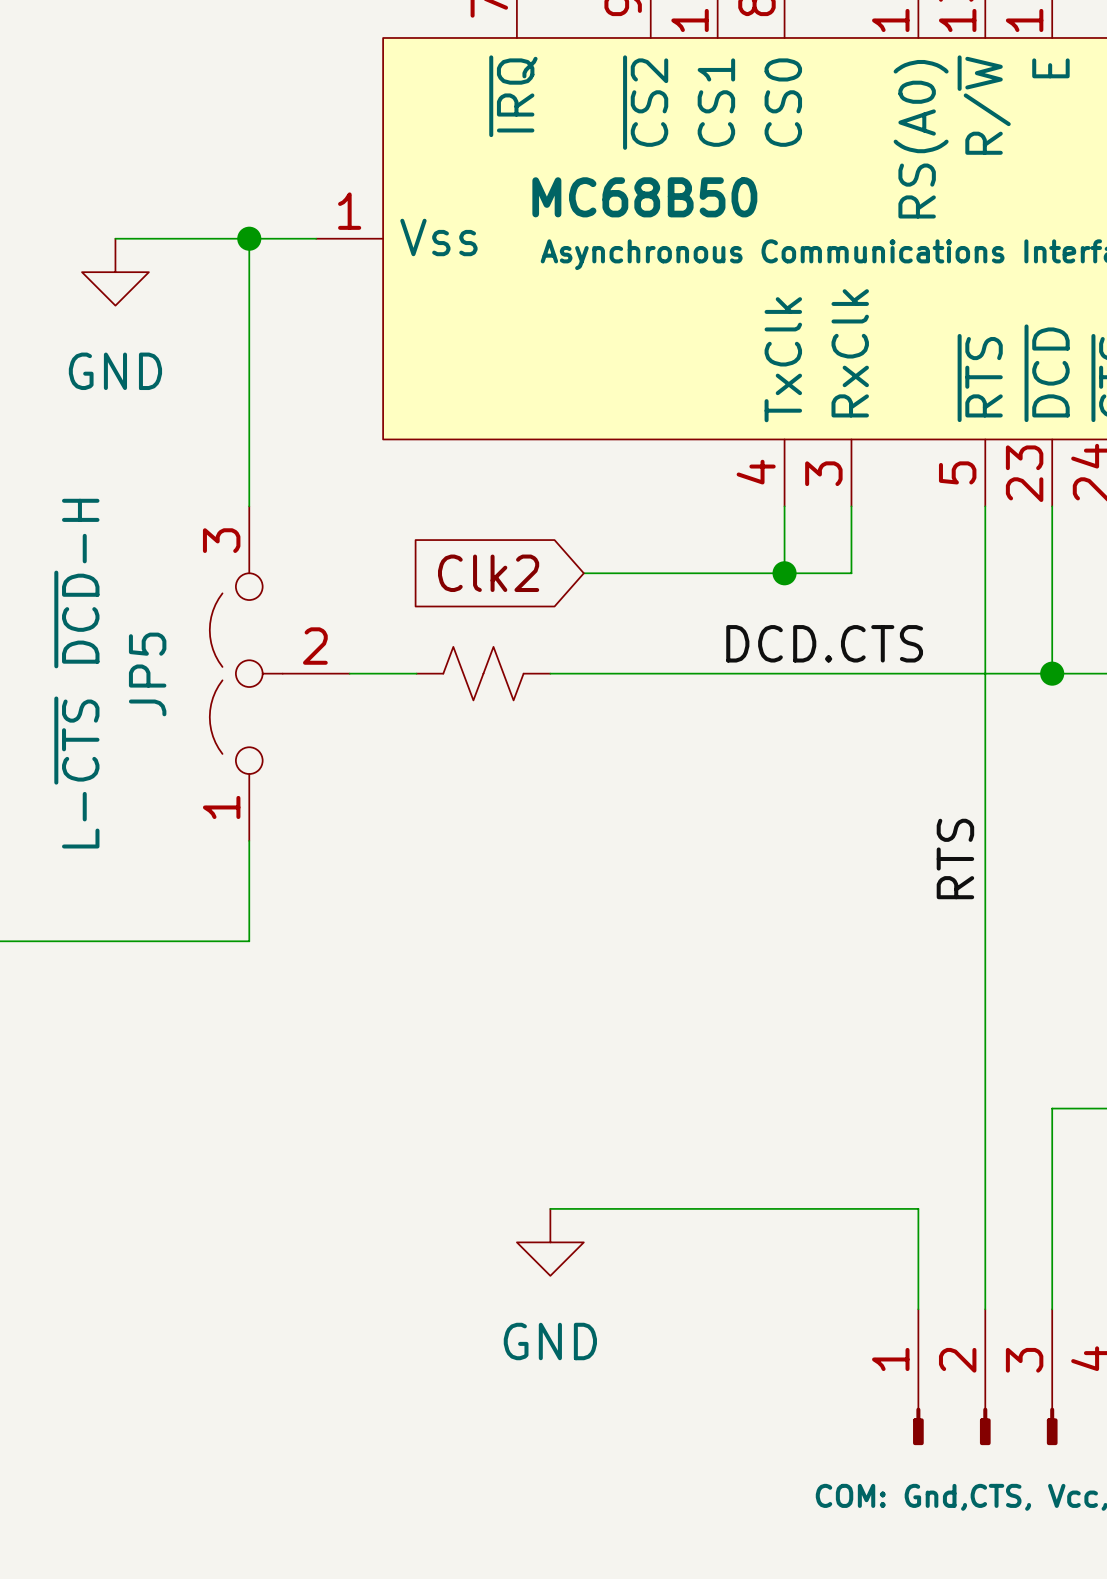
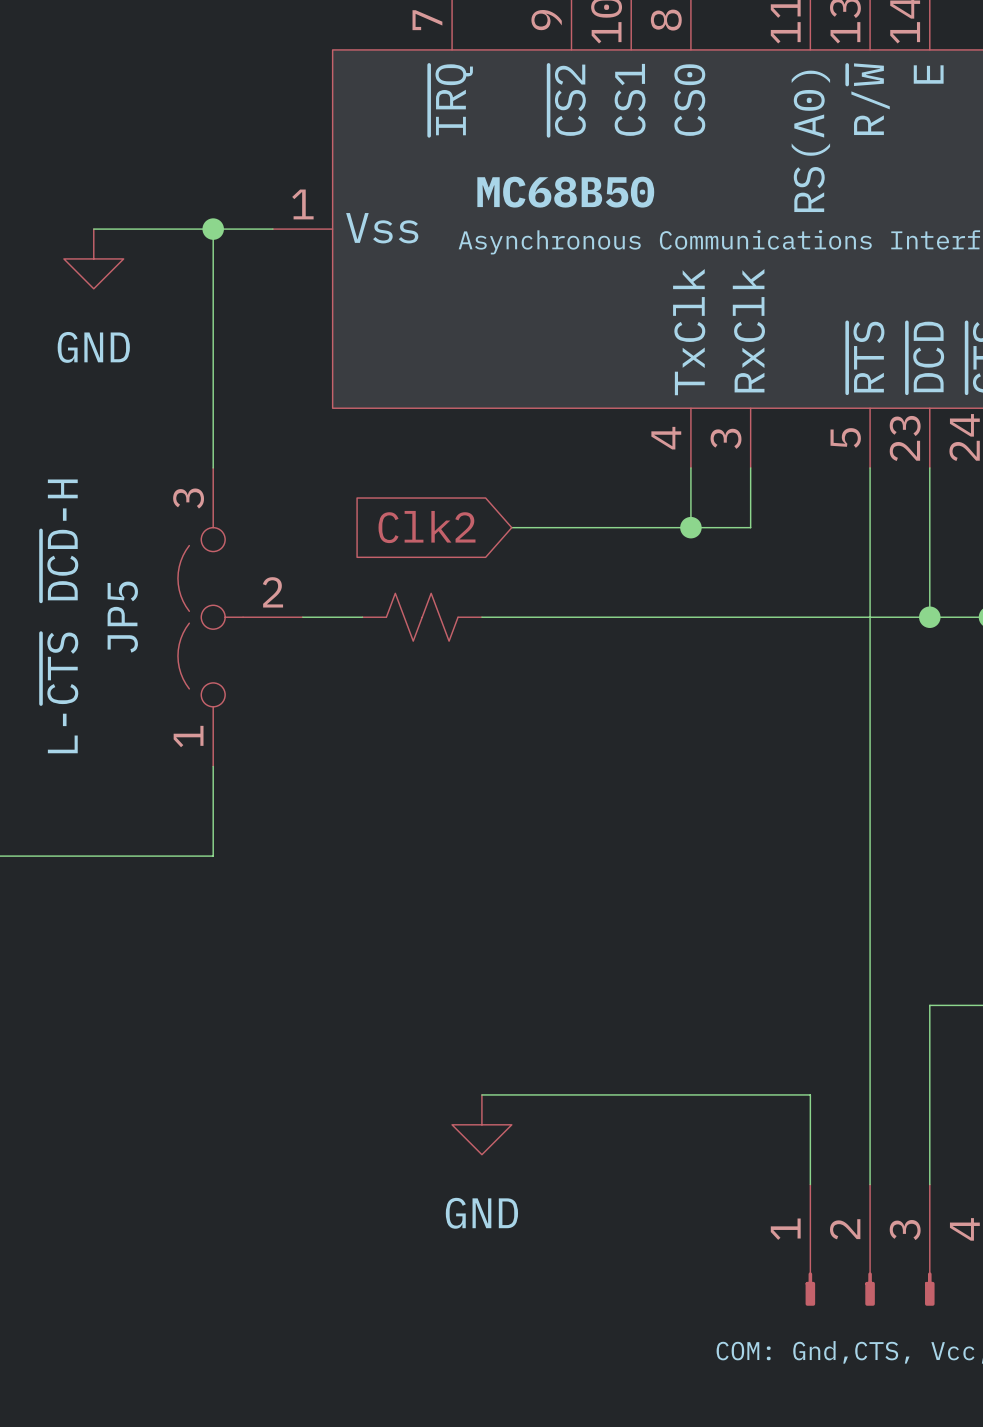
label: DCD.CTS (824, 643) -> none
label: RTS (955, 858) -> none

